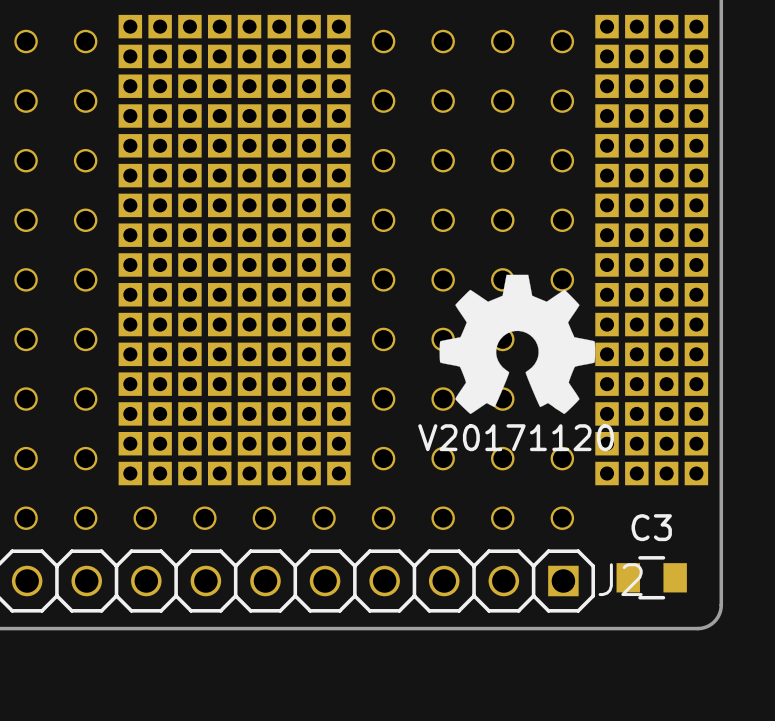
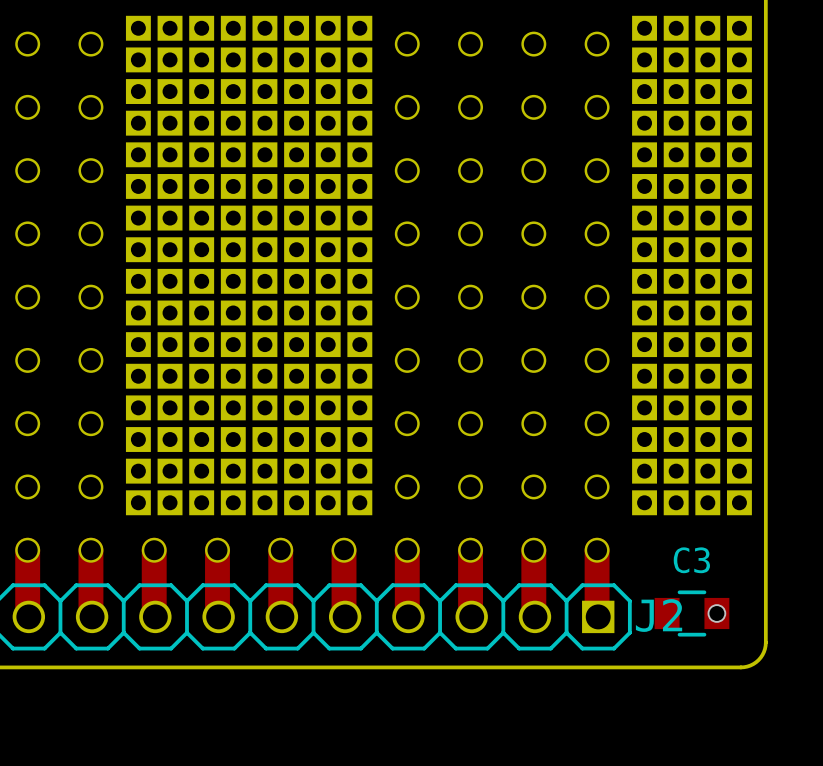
drawing: [439, 274, 596, 415] -> none
track: none -> (27, 550) (28, 616)
track: none -> (90, 550) (92, 616)
track: none -> (154, 550) (155, 616)
track: none -> (217, 550) (218, 616)
track: none -> (280, 550) (281, 616)
track: none -> (344, 550) (345, 616)
track: none -> (407, 550) (408, 616)
track: none -> (470, 550) (471, 616)
track: none -> (533, 550) (534, 616)
track: none -> (597, 550) (598, 616)
via: none -> (716, 613)

